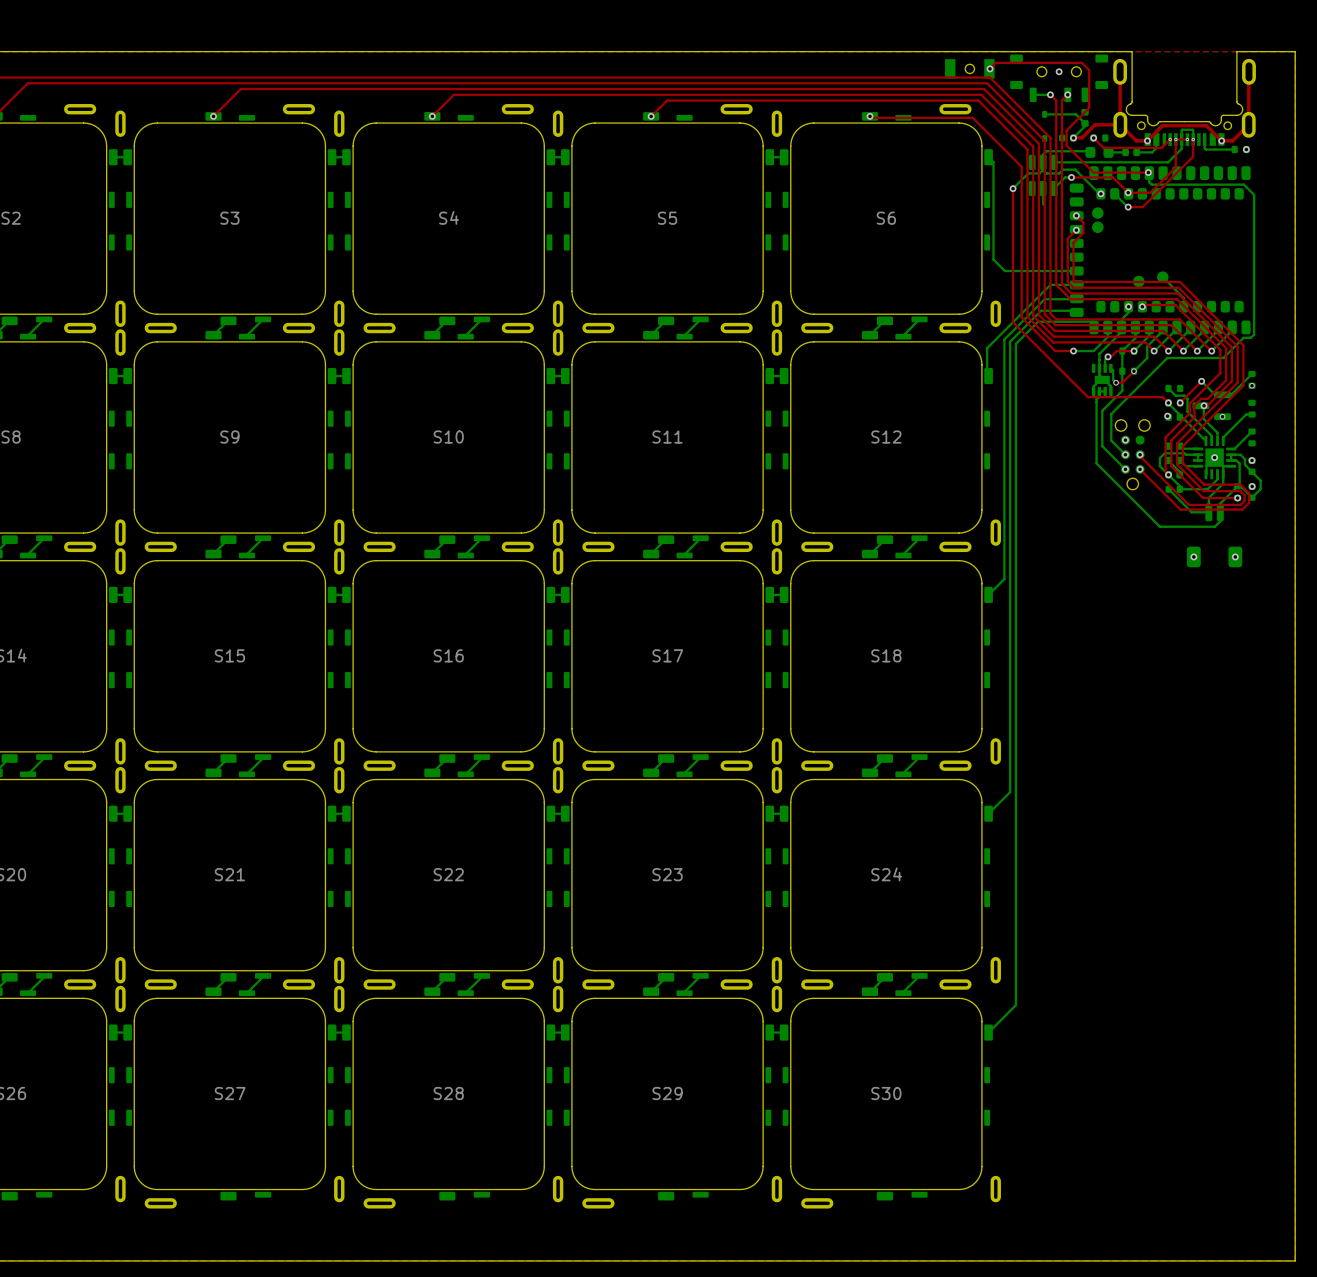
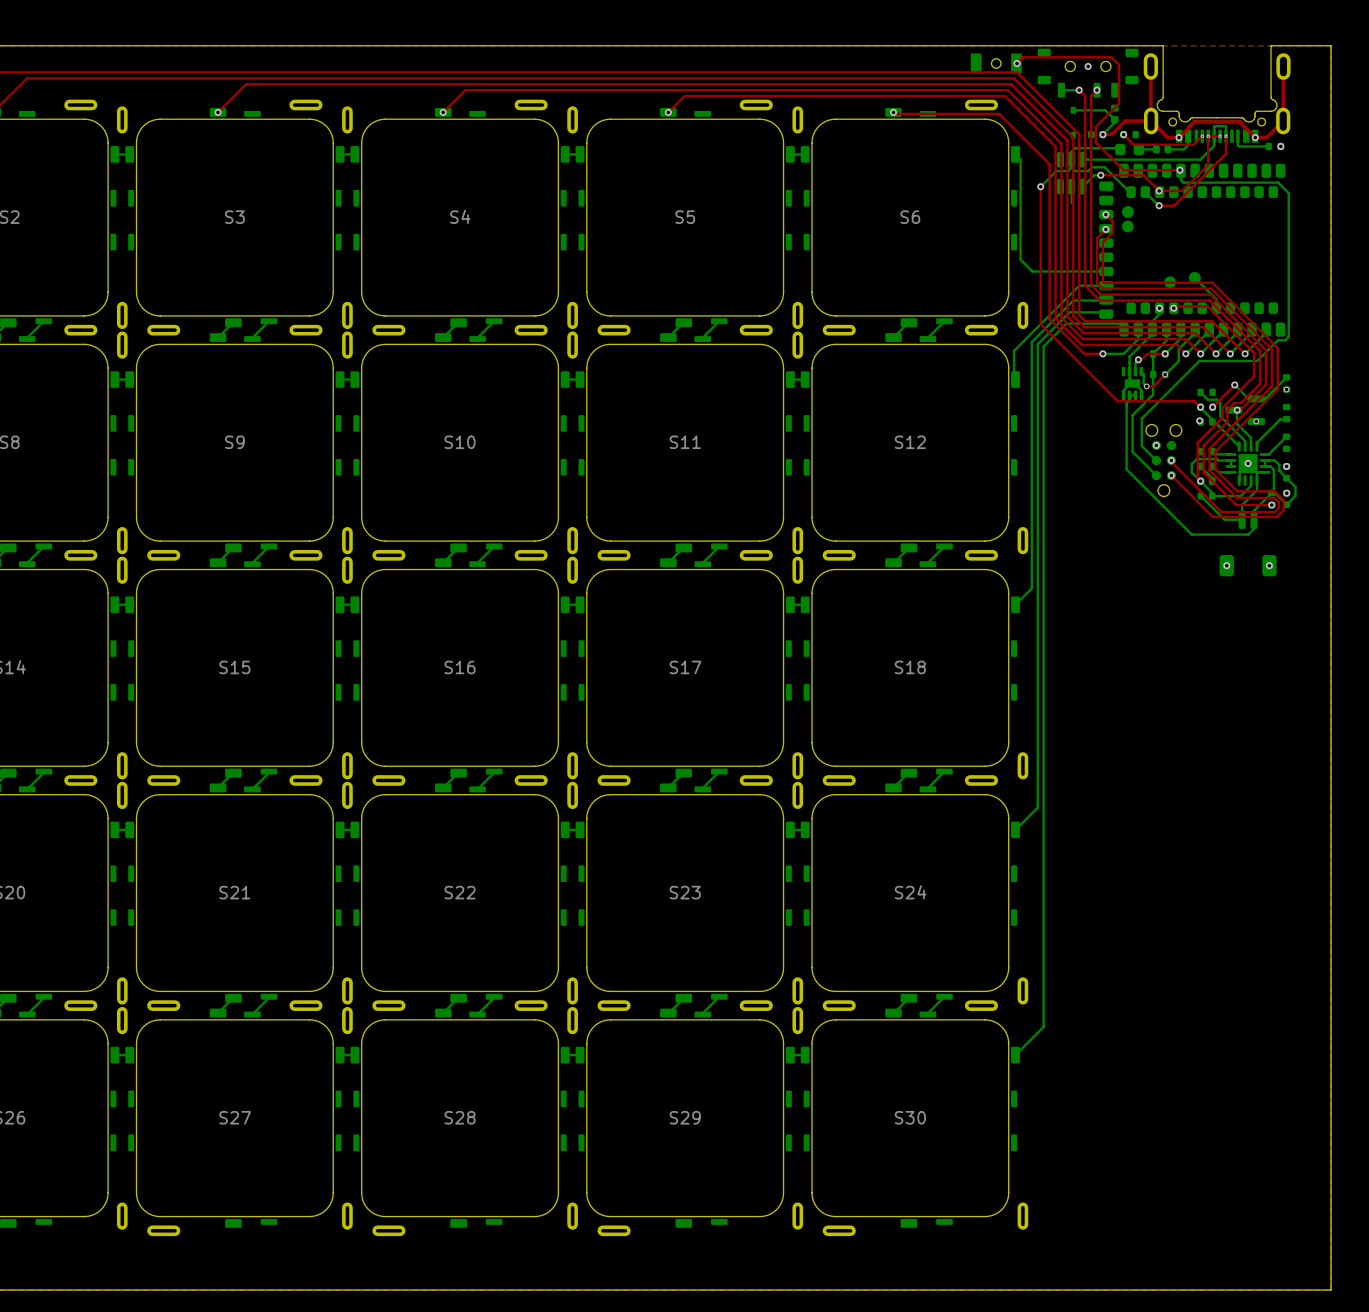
via: (1100, 193) -> none
via: (1125, 454) -> none
via: (1125, 469) -> none

